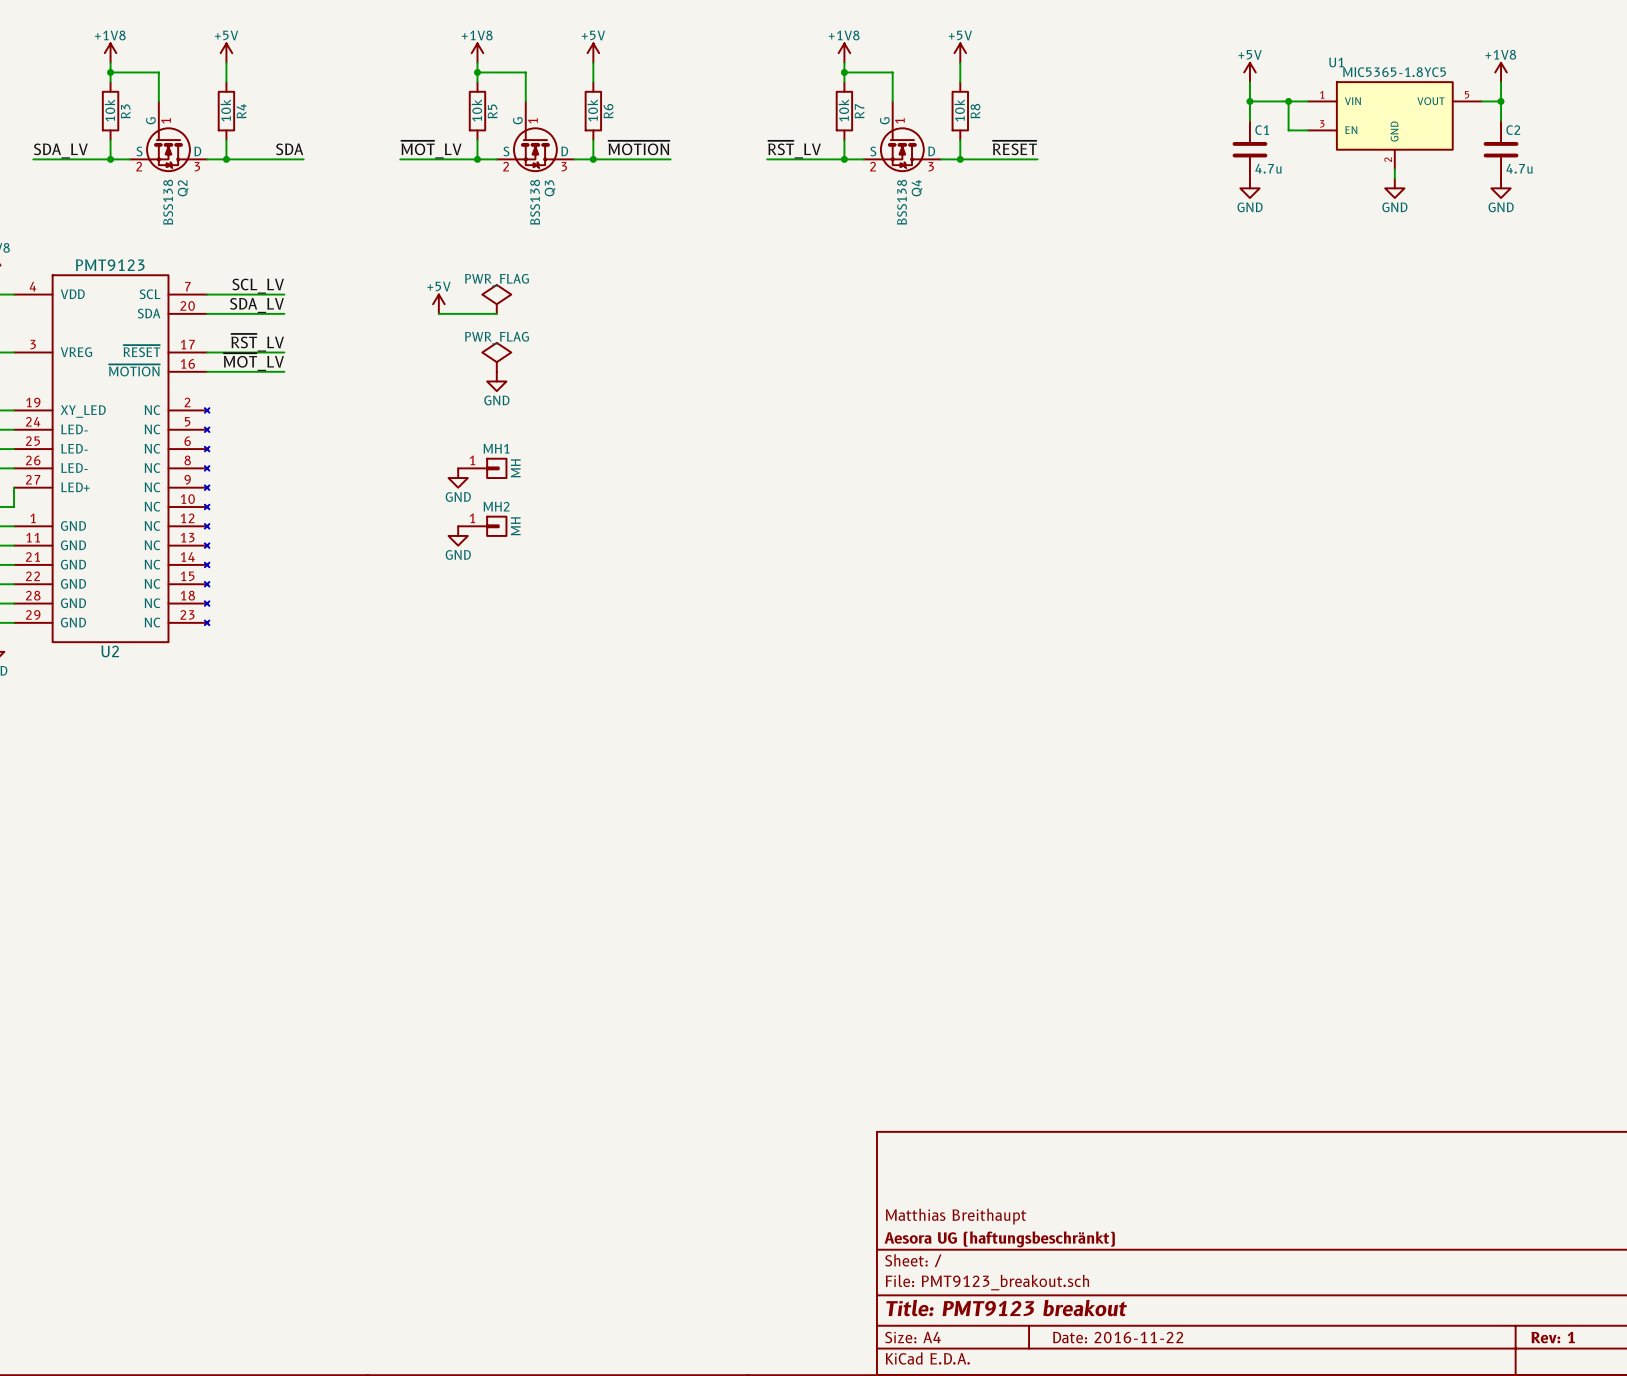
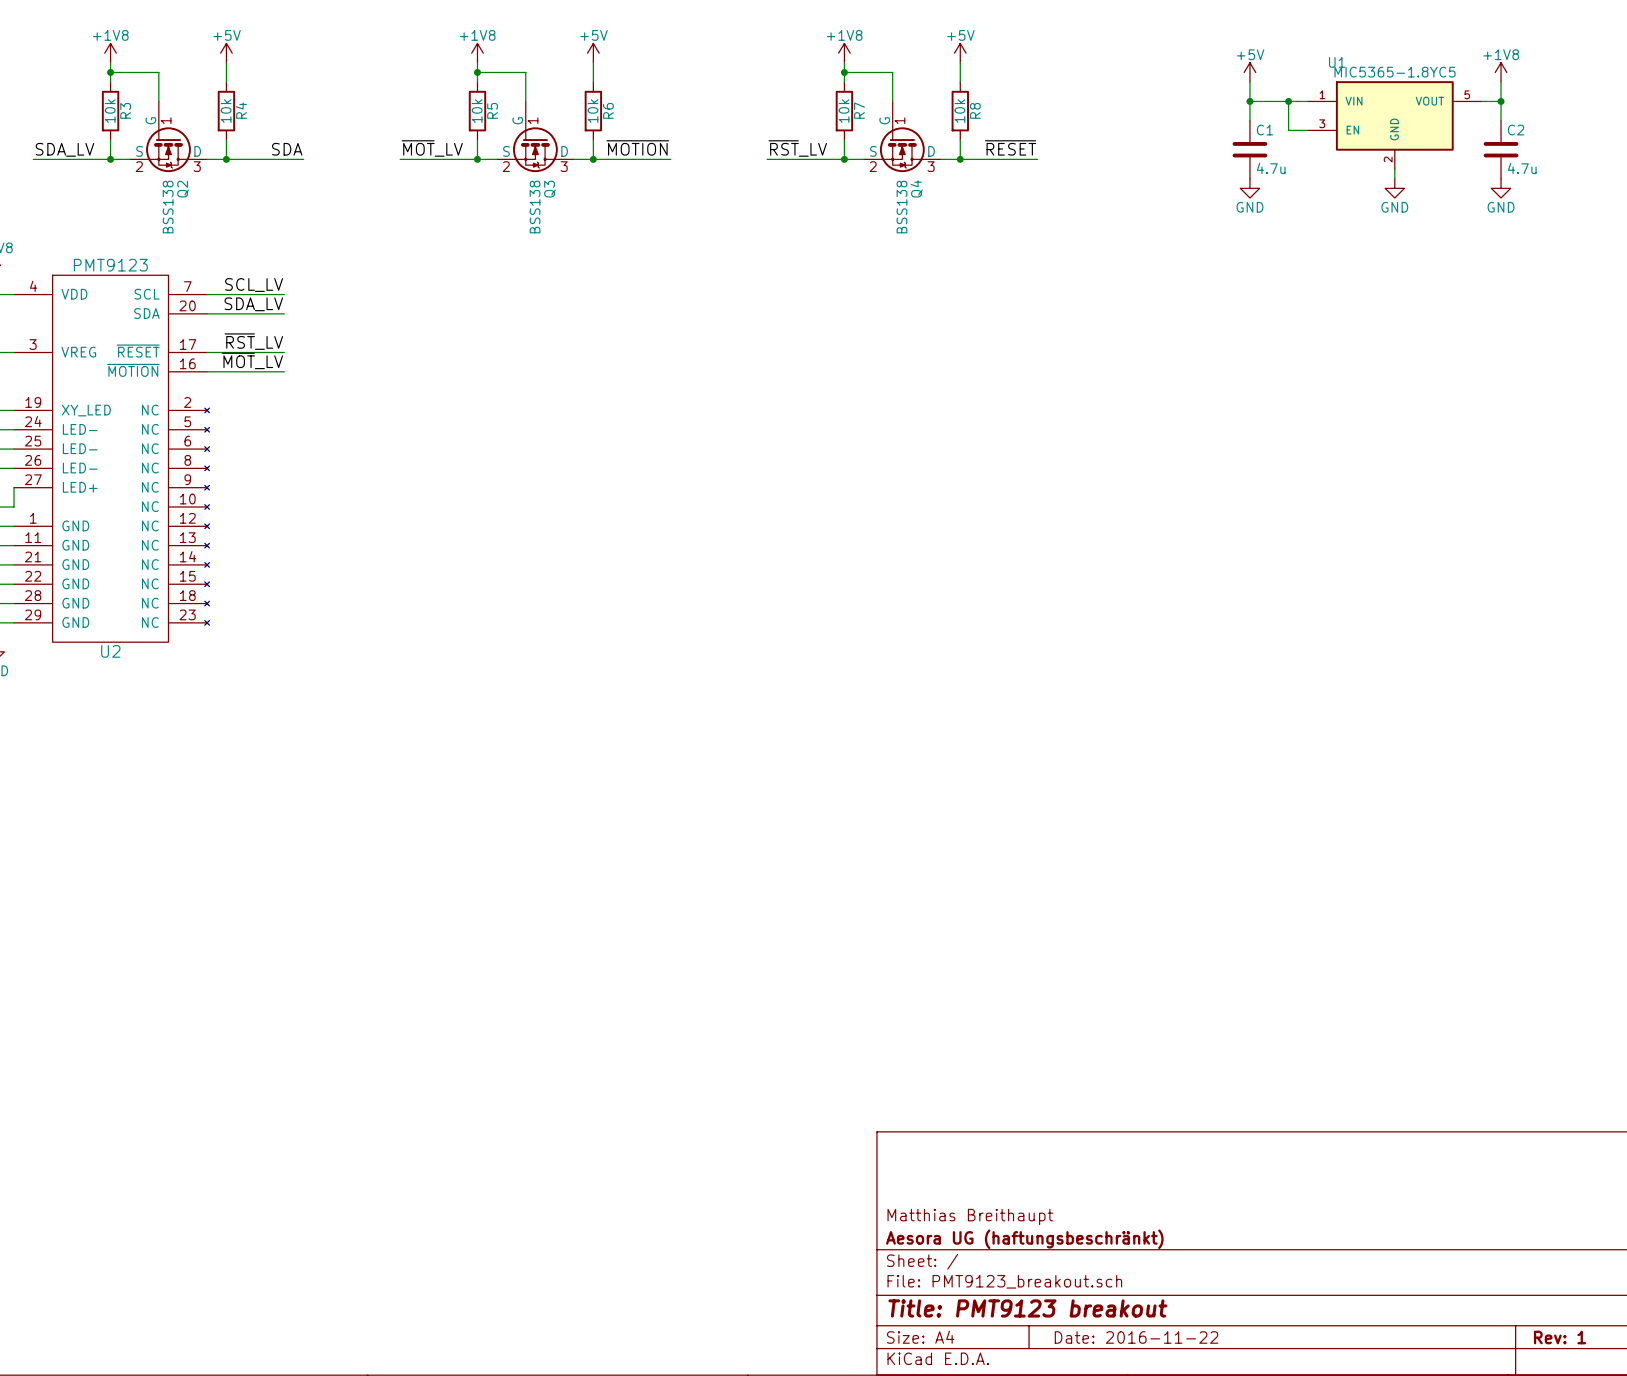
power symbol: PWR_FLAG (496, 299) -> none
power symbol: +5V (438, 304) -> none
wire: (438, 313) (496, 313) -> none
power symbol: PWR_FLAG (496, 357) -> none
power symbol: GND (496, 381) -> none
MH1: MH (482, 468) -> none
power symbol: GND (458, 478) -> none
MH2: MH (482, 526) -> none
power symbol: GND (458, 535) -> none

